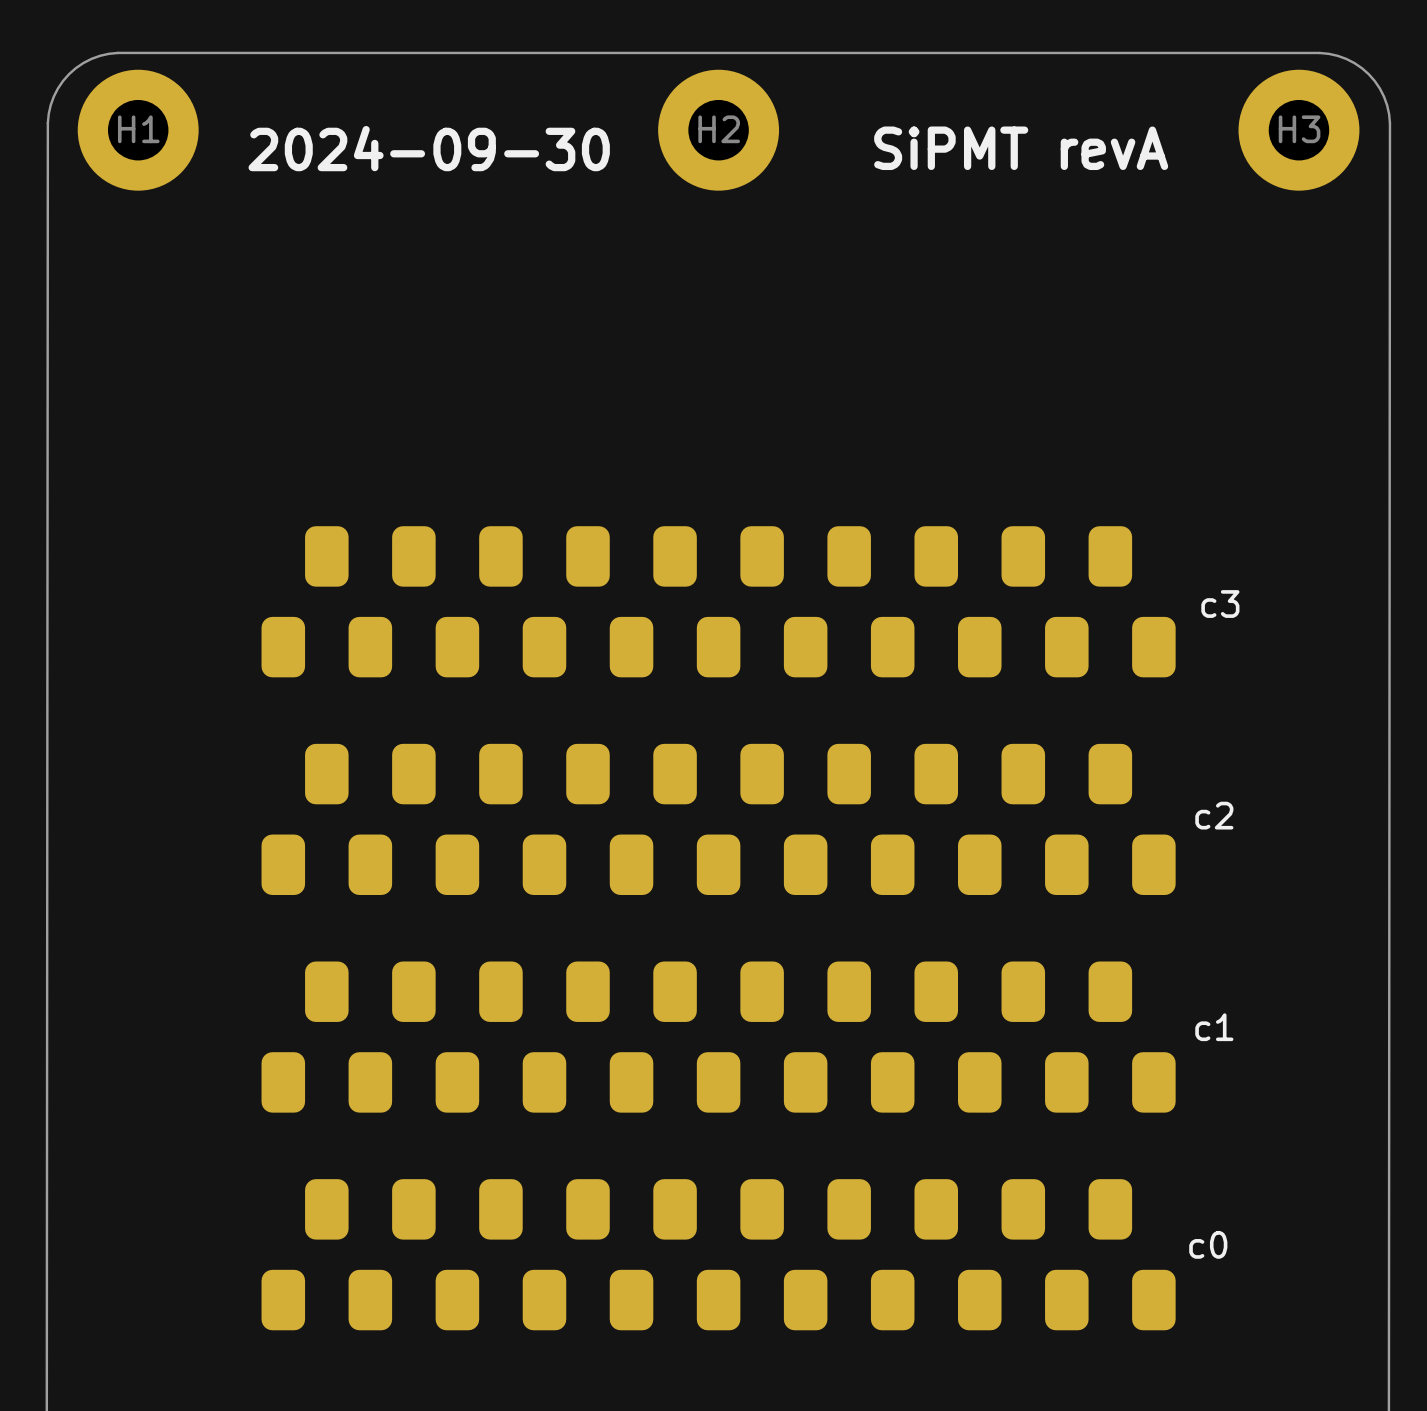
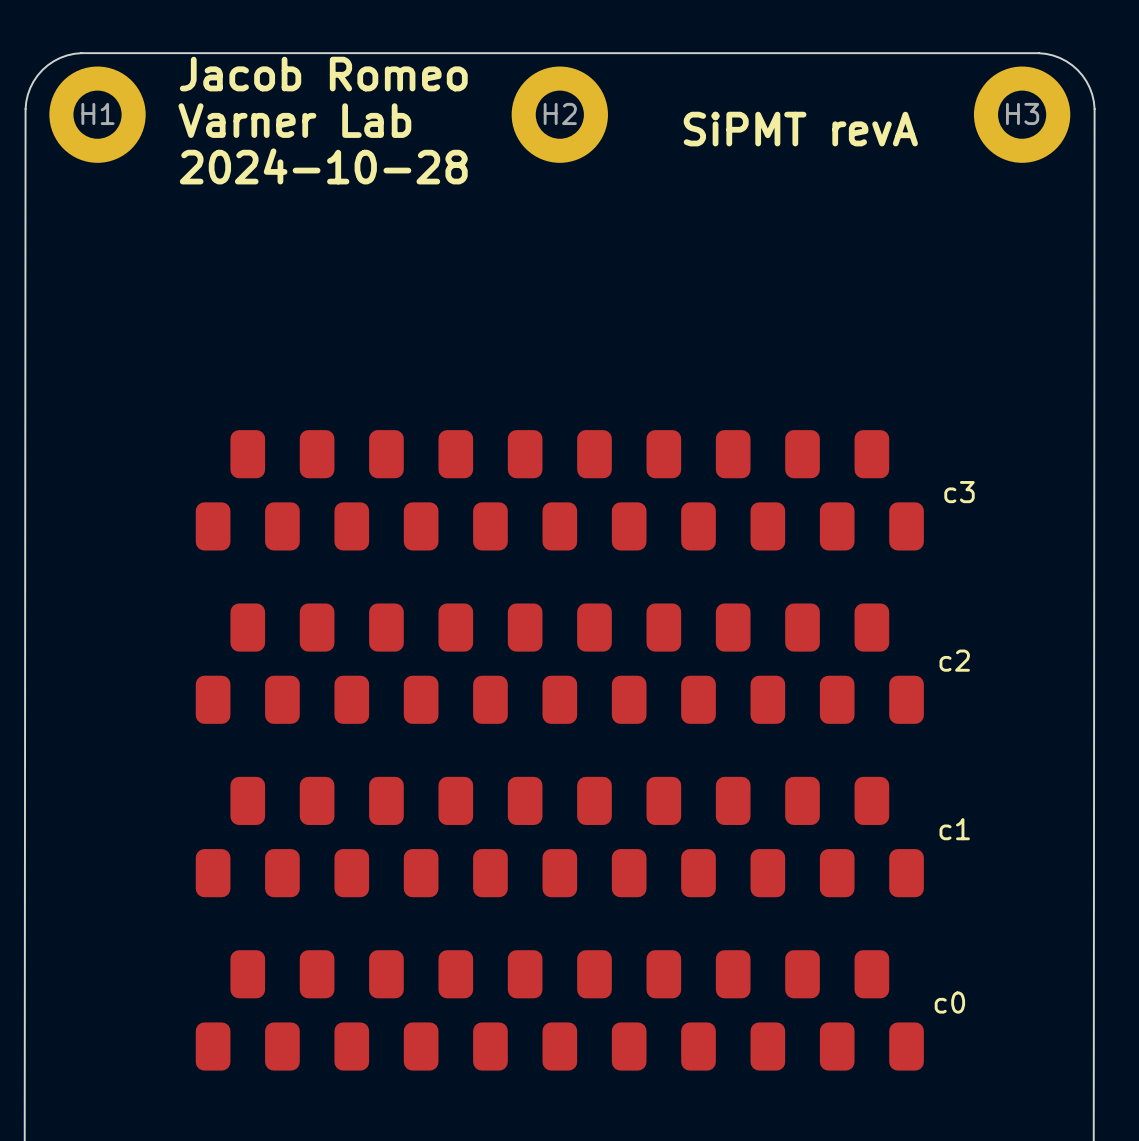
text: none -> Jacob Romeo (323, 74)
text: 2024-09-30 (429, 148) -> Varner Lab (294, 120)
text: none -> 2024-10-28 (323, 166)

